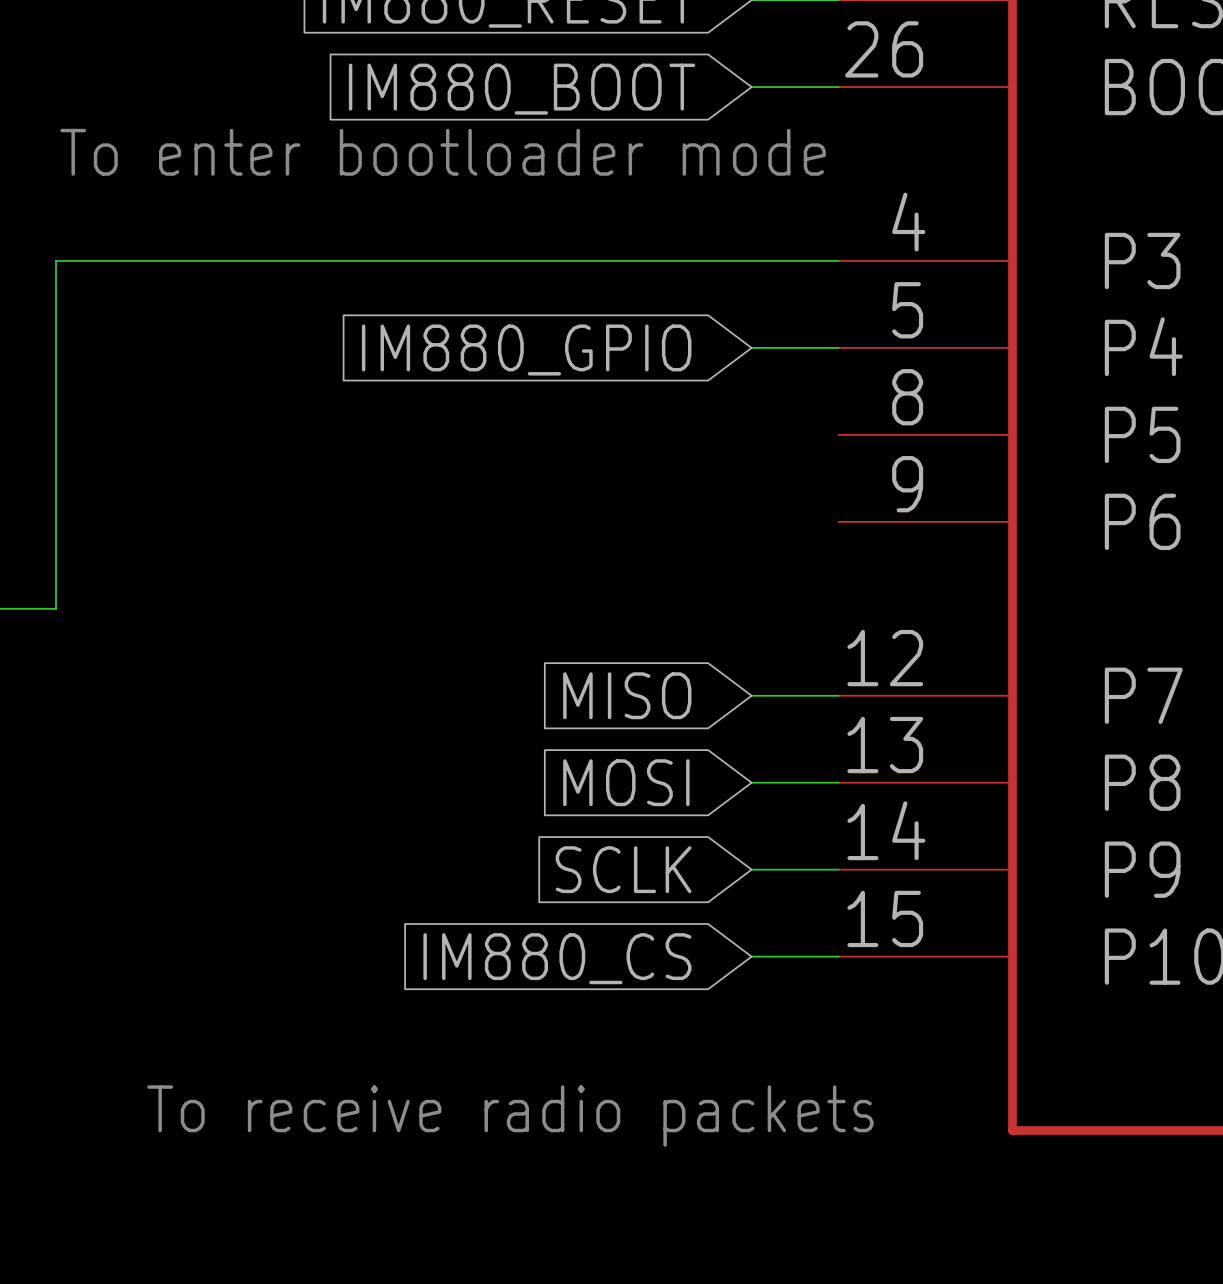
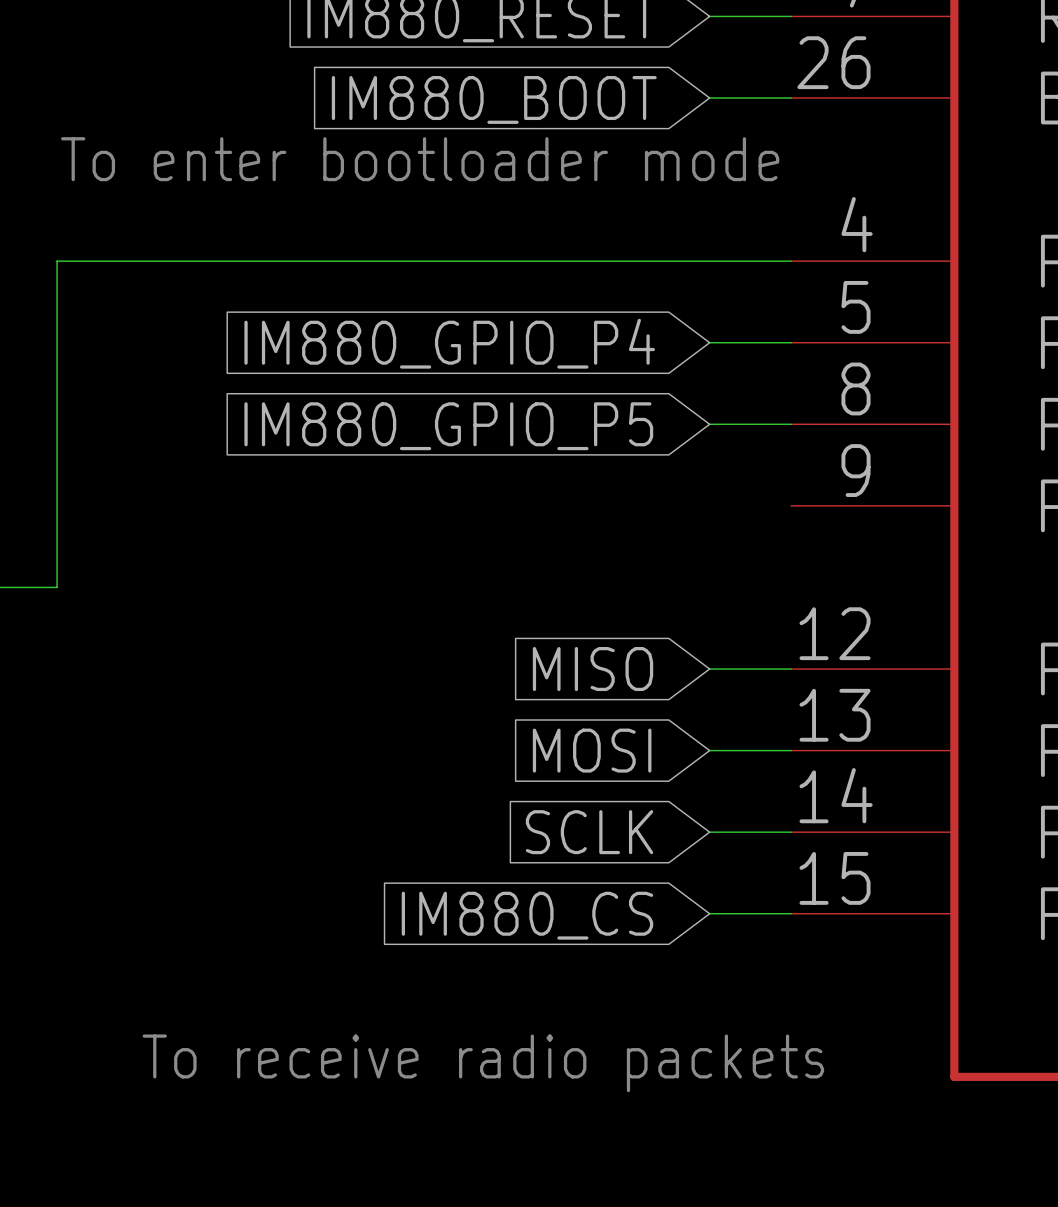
global label: IM880_GPIO (526, 350) -> IM880_GPIO_P4 (449, 343)
wire: none -> (709, 424) (791, 424)
global label: none -> IM880_GPIO_P5 (448, 426)

